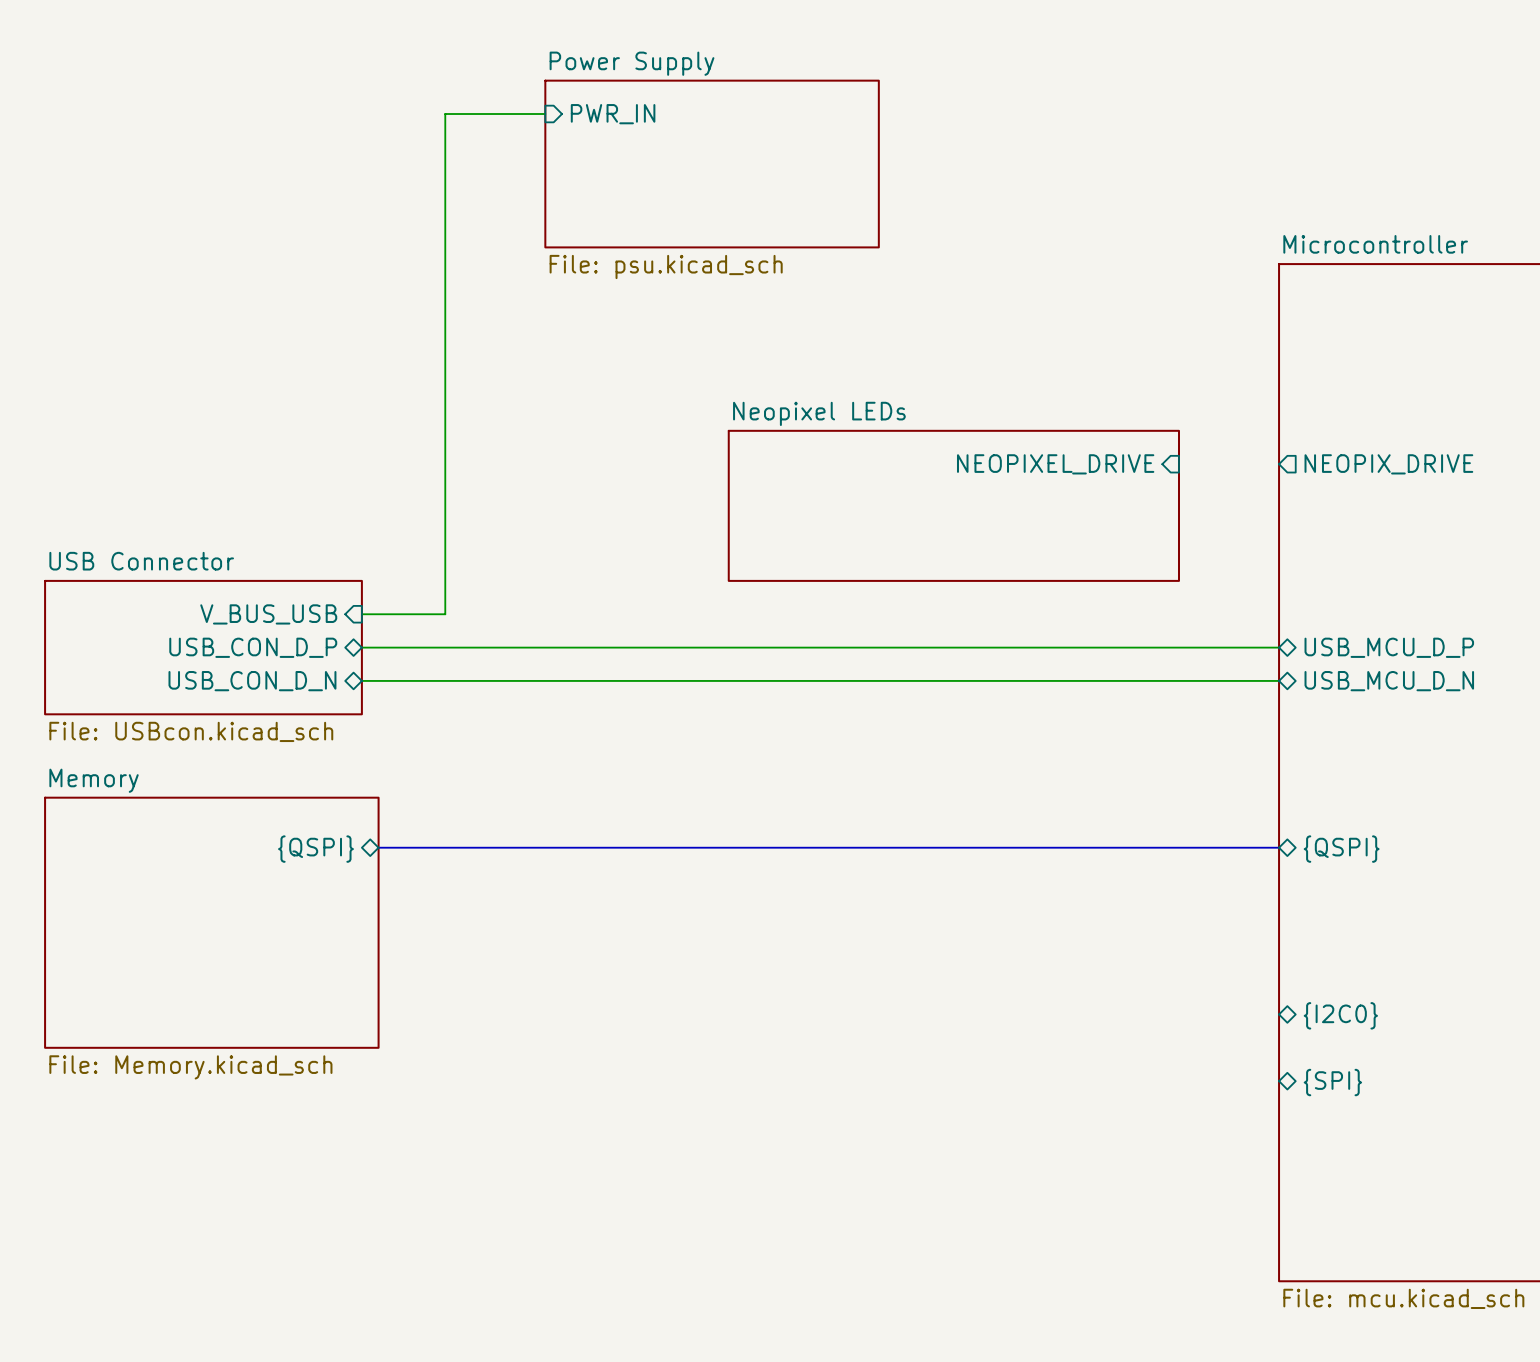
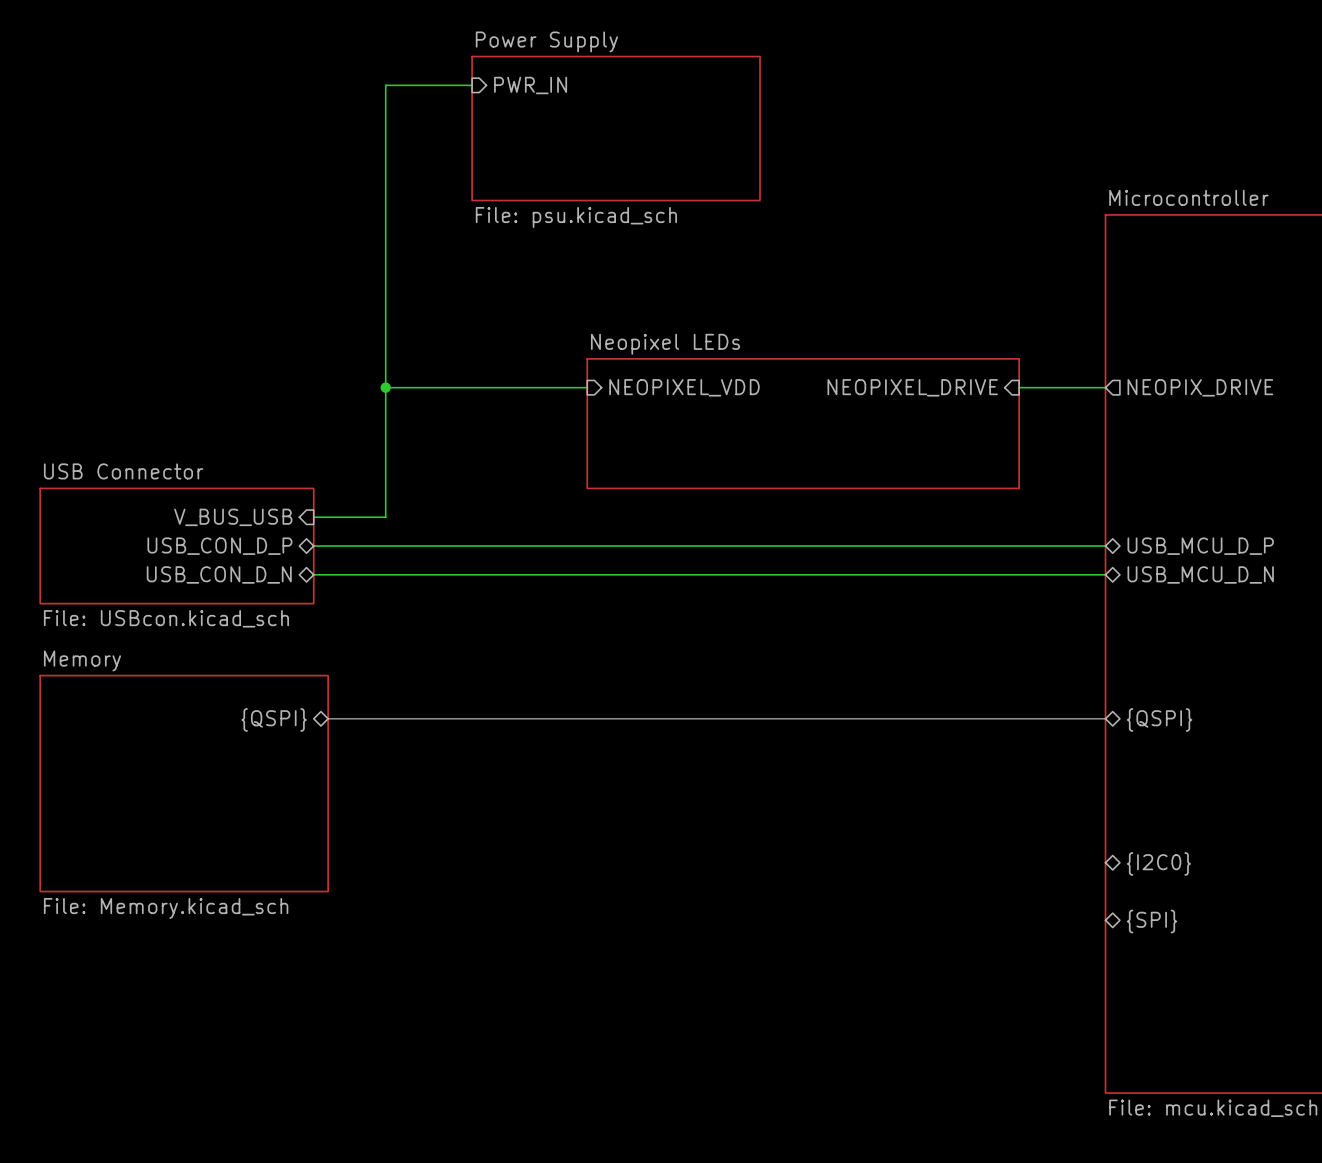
wire: none -> (385, 387) (587, 387)
junction: none -> (385, 387)
sheet pin: none -> NEOPIXEL_VDD (684, 387)
wire: none -> (1019, 387) (1105, 387)
sheet Neopixel LEDs: none -> (803, 423)
sheet Neopixel LEDs: (953, 505) -> none

